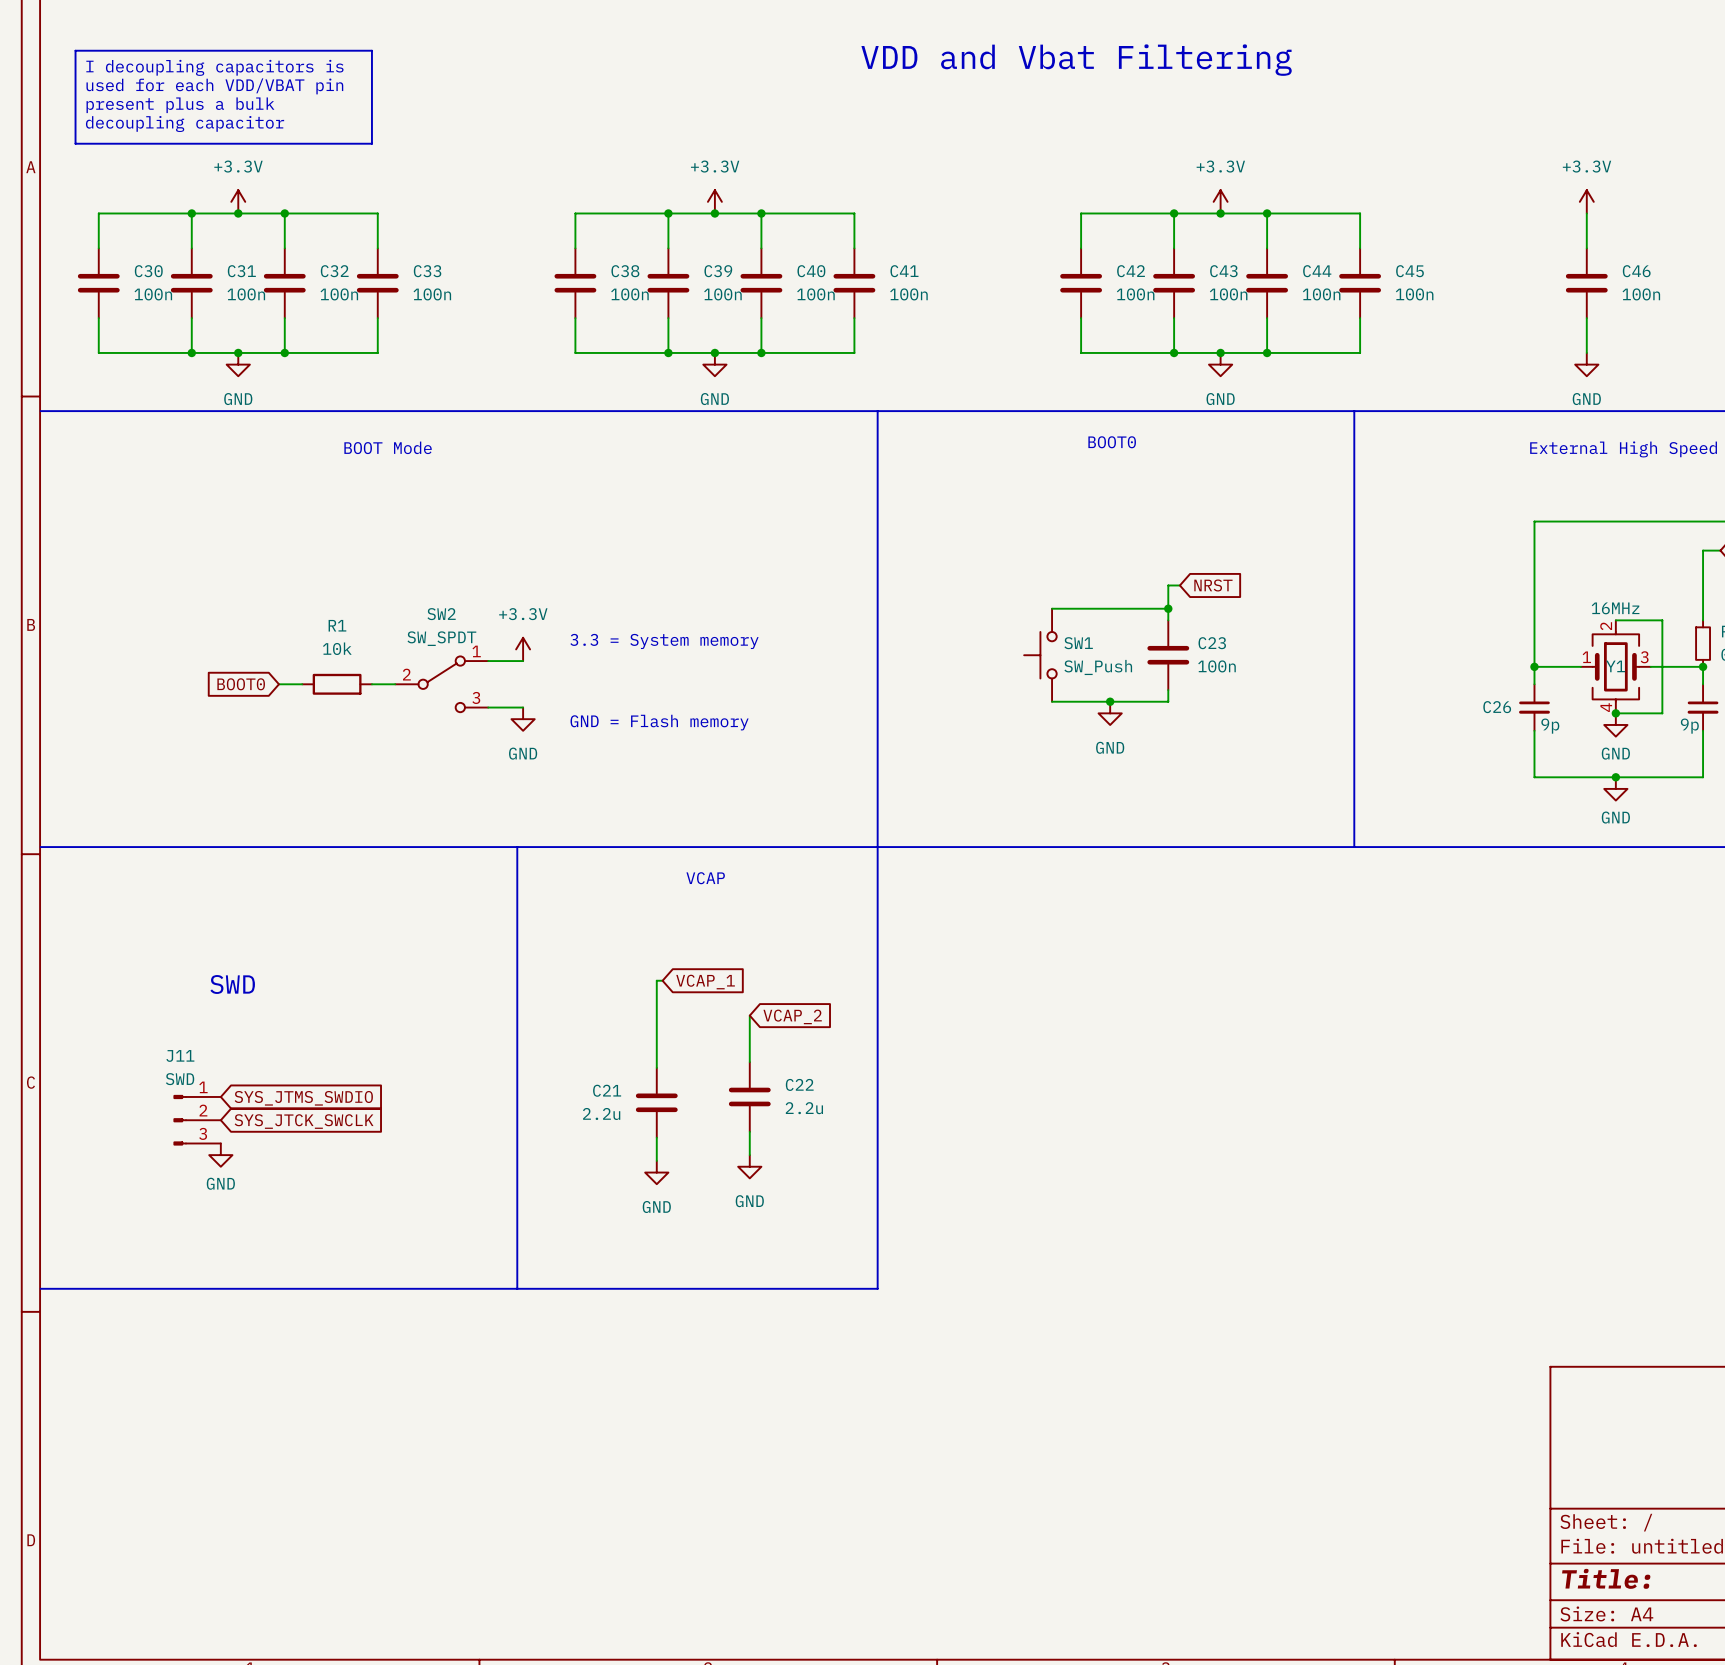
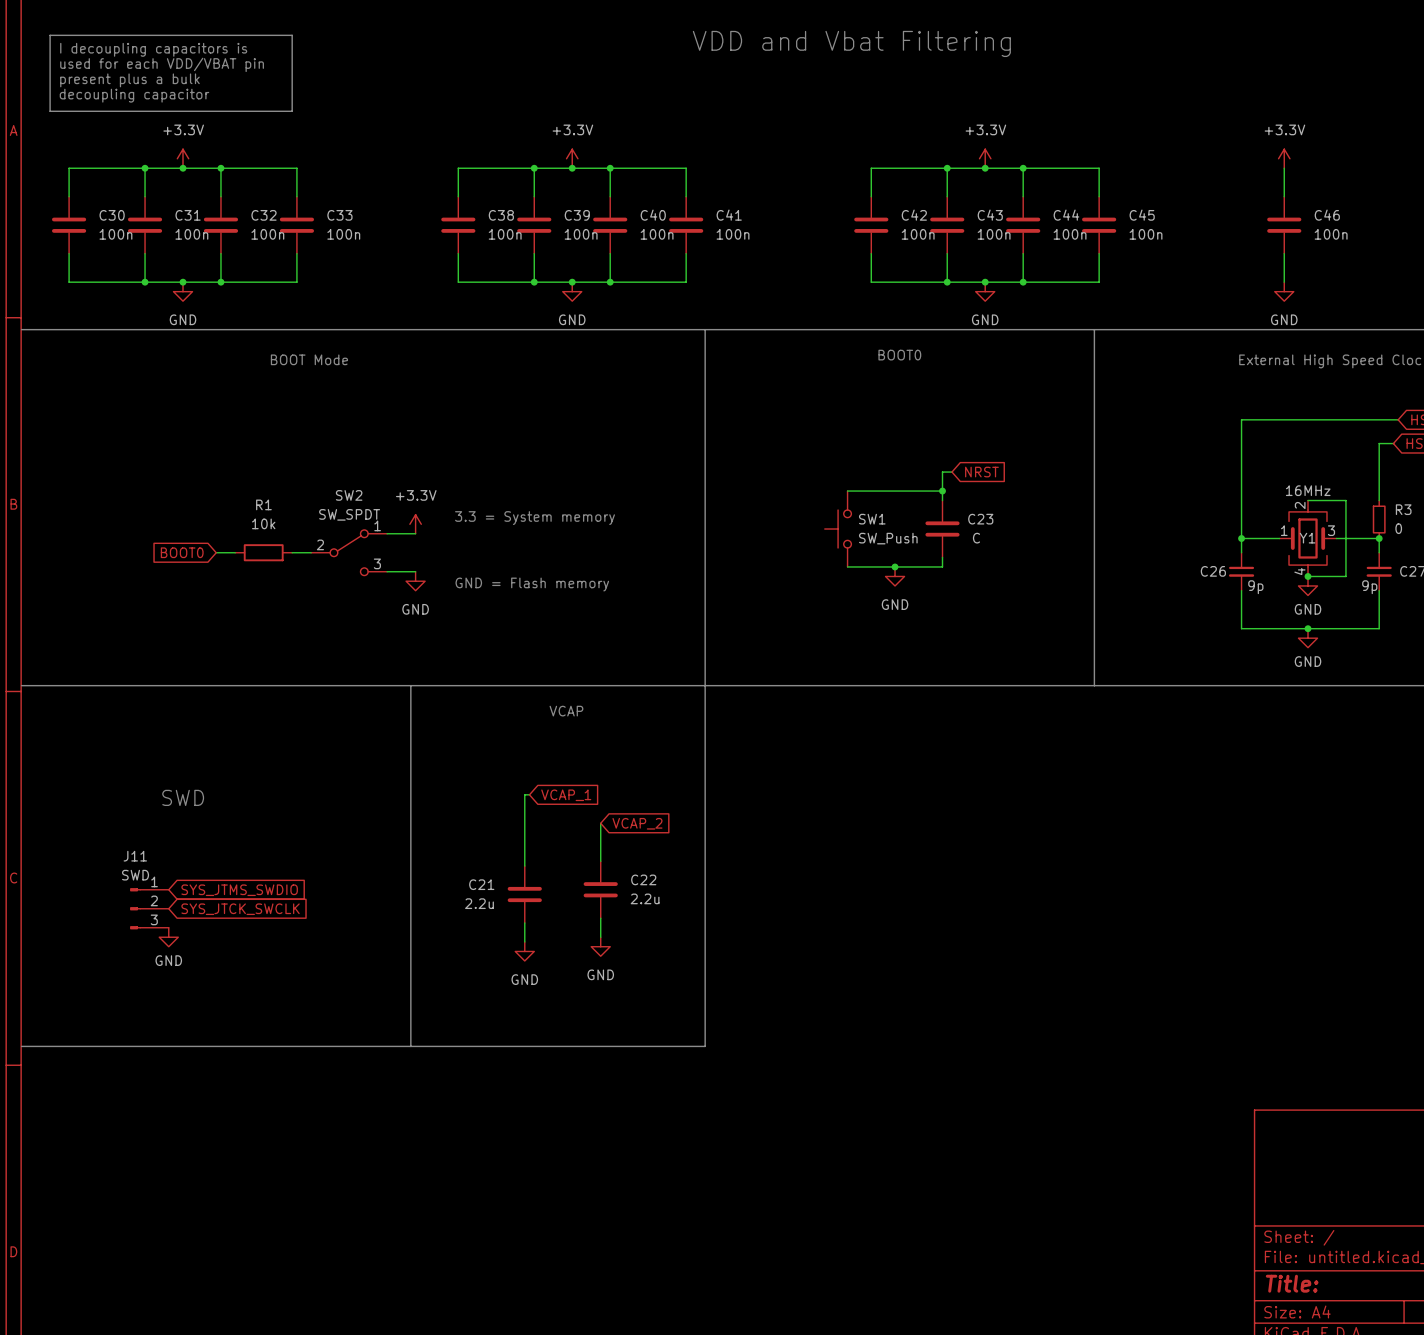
C23 value: 100n (1217, 666) -> C (976, 538)

